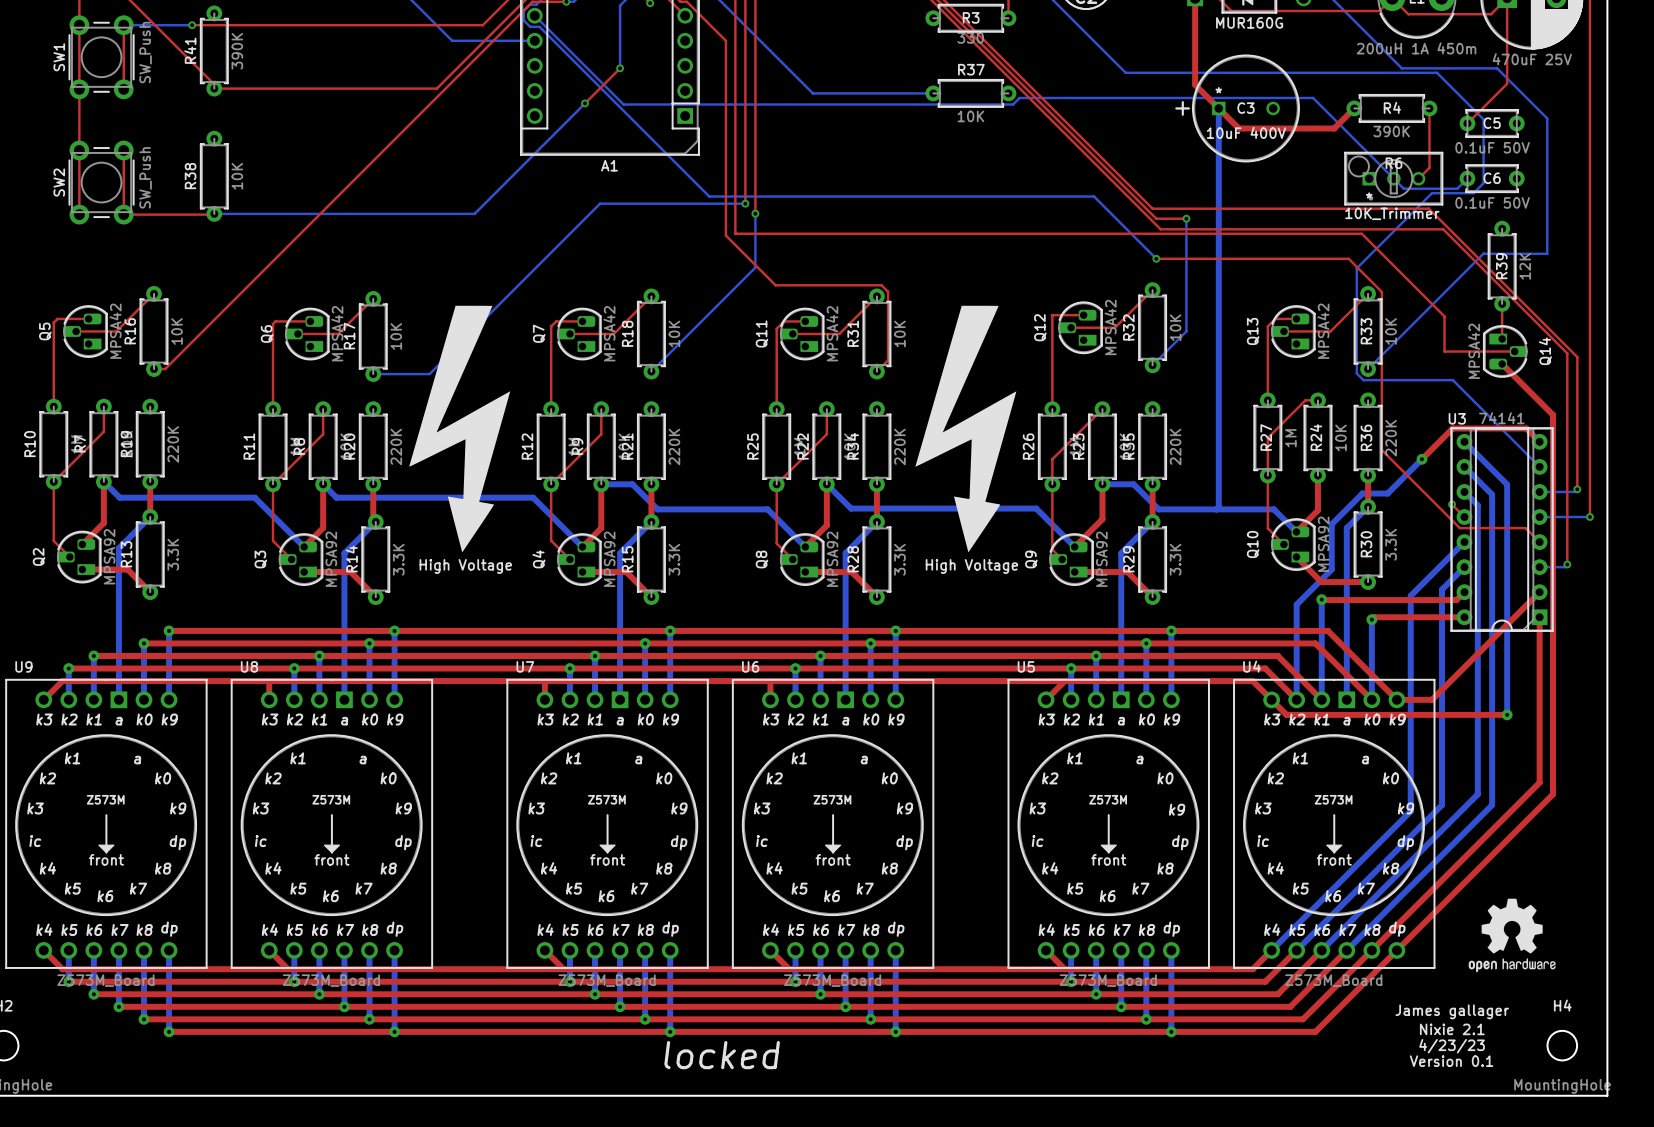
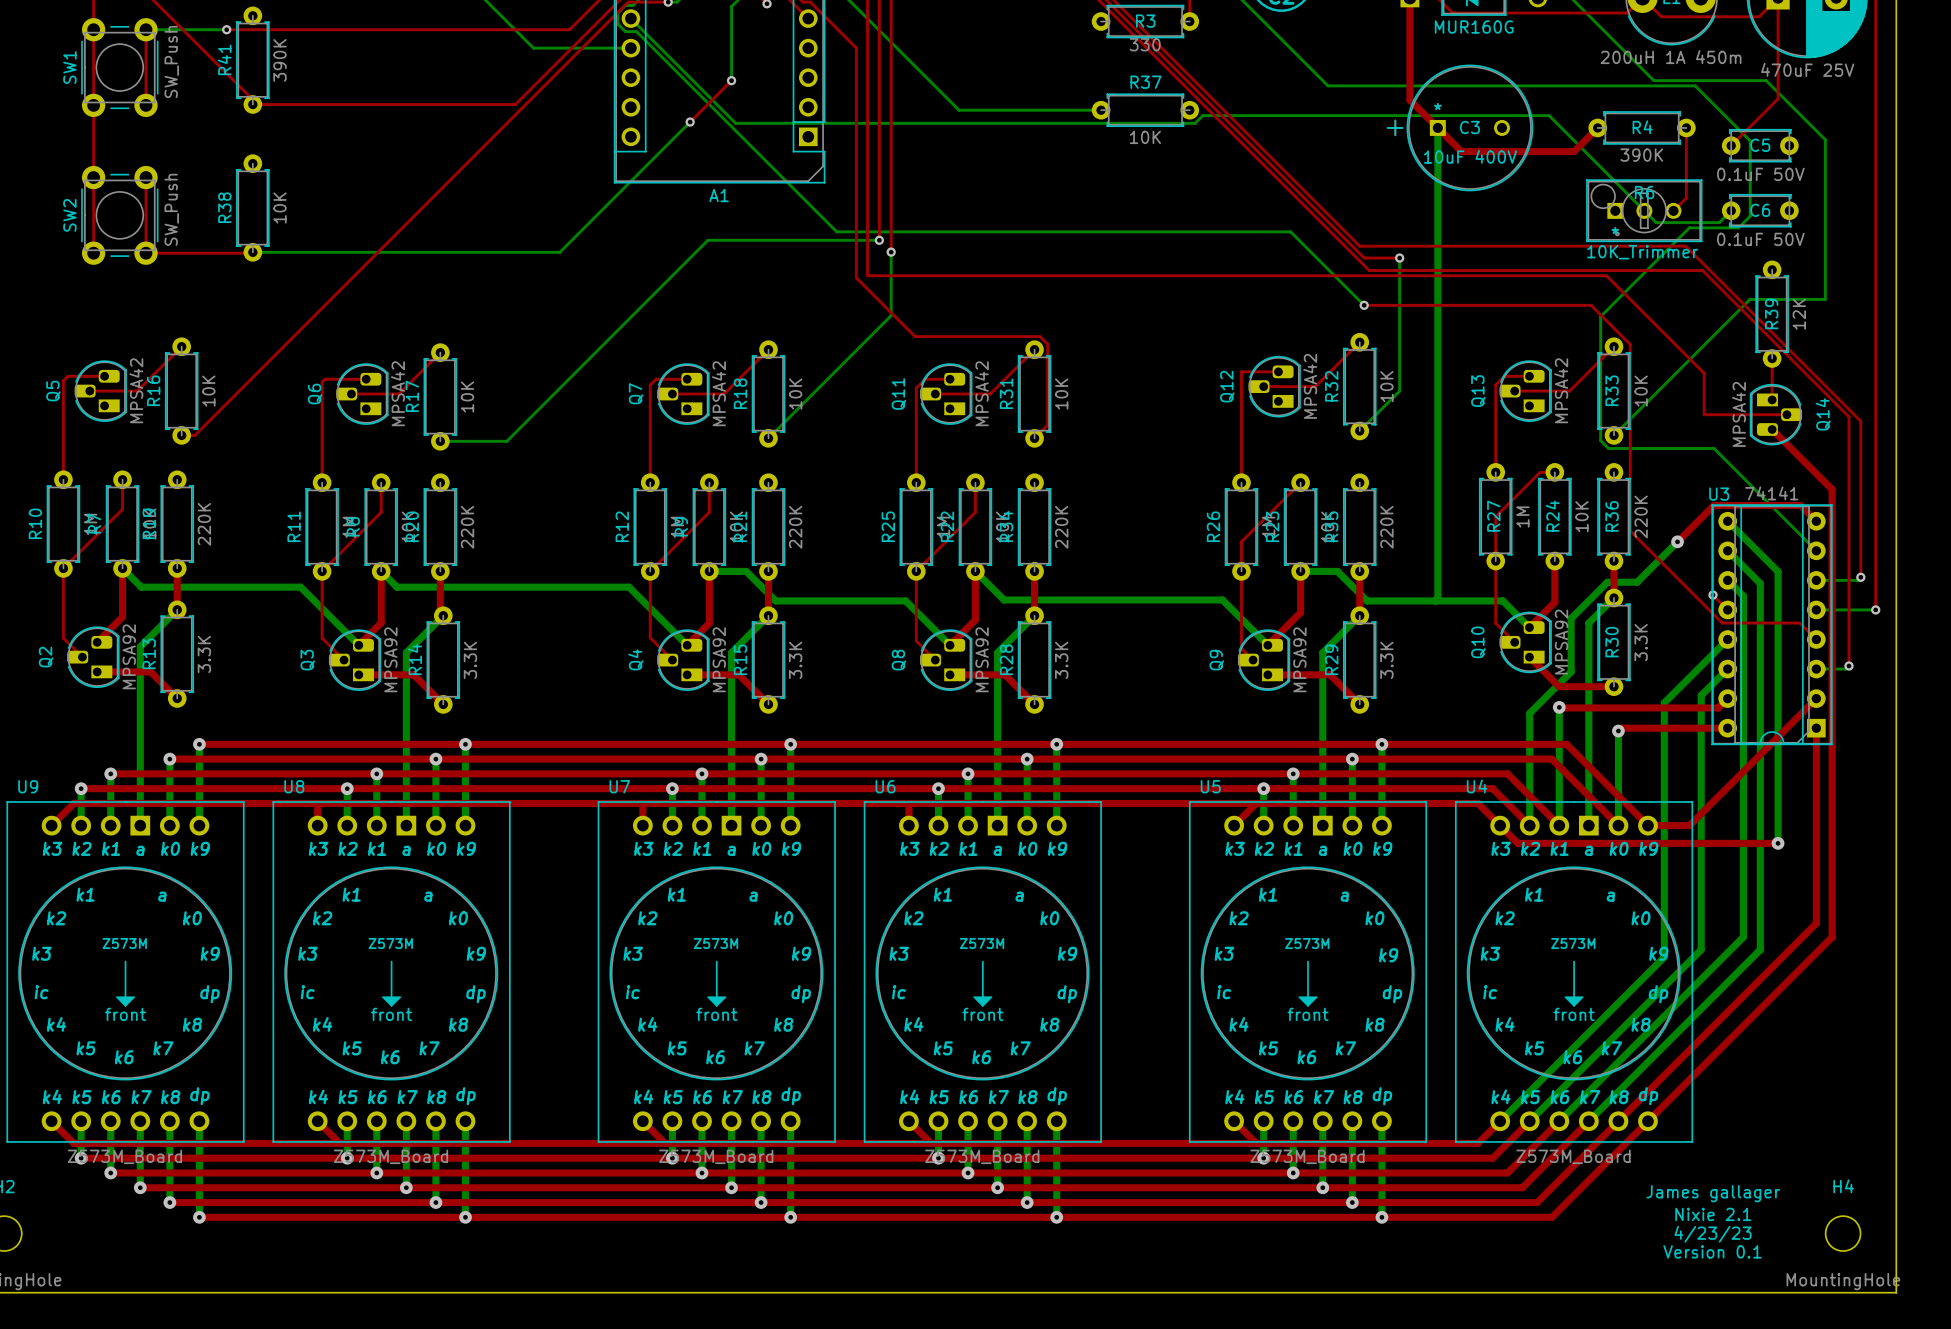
drawing: [409, 305, 511, 553] -> none
drawing: [915, 305, 1017, 553] -> none
drawing: [1468, 898, 1556, 973] -> none
text: locked (722, 1055) -> none

